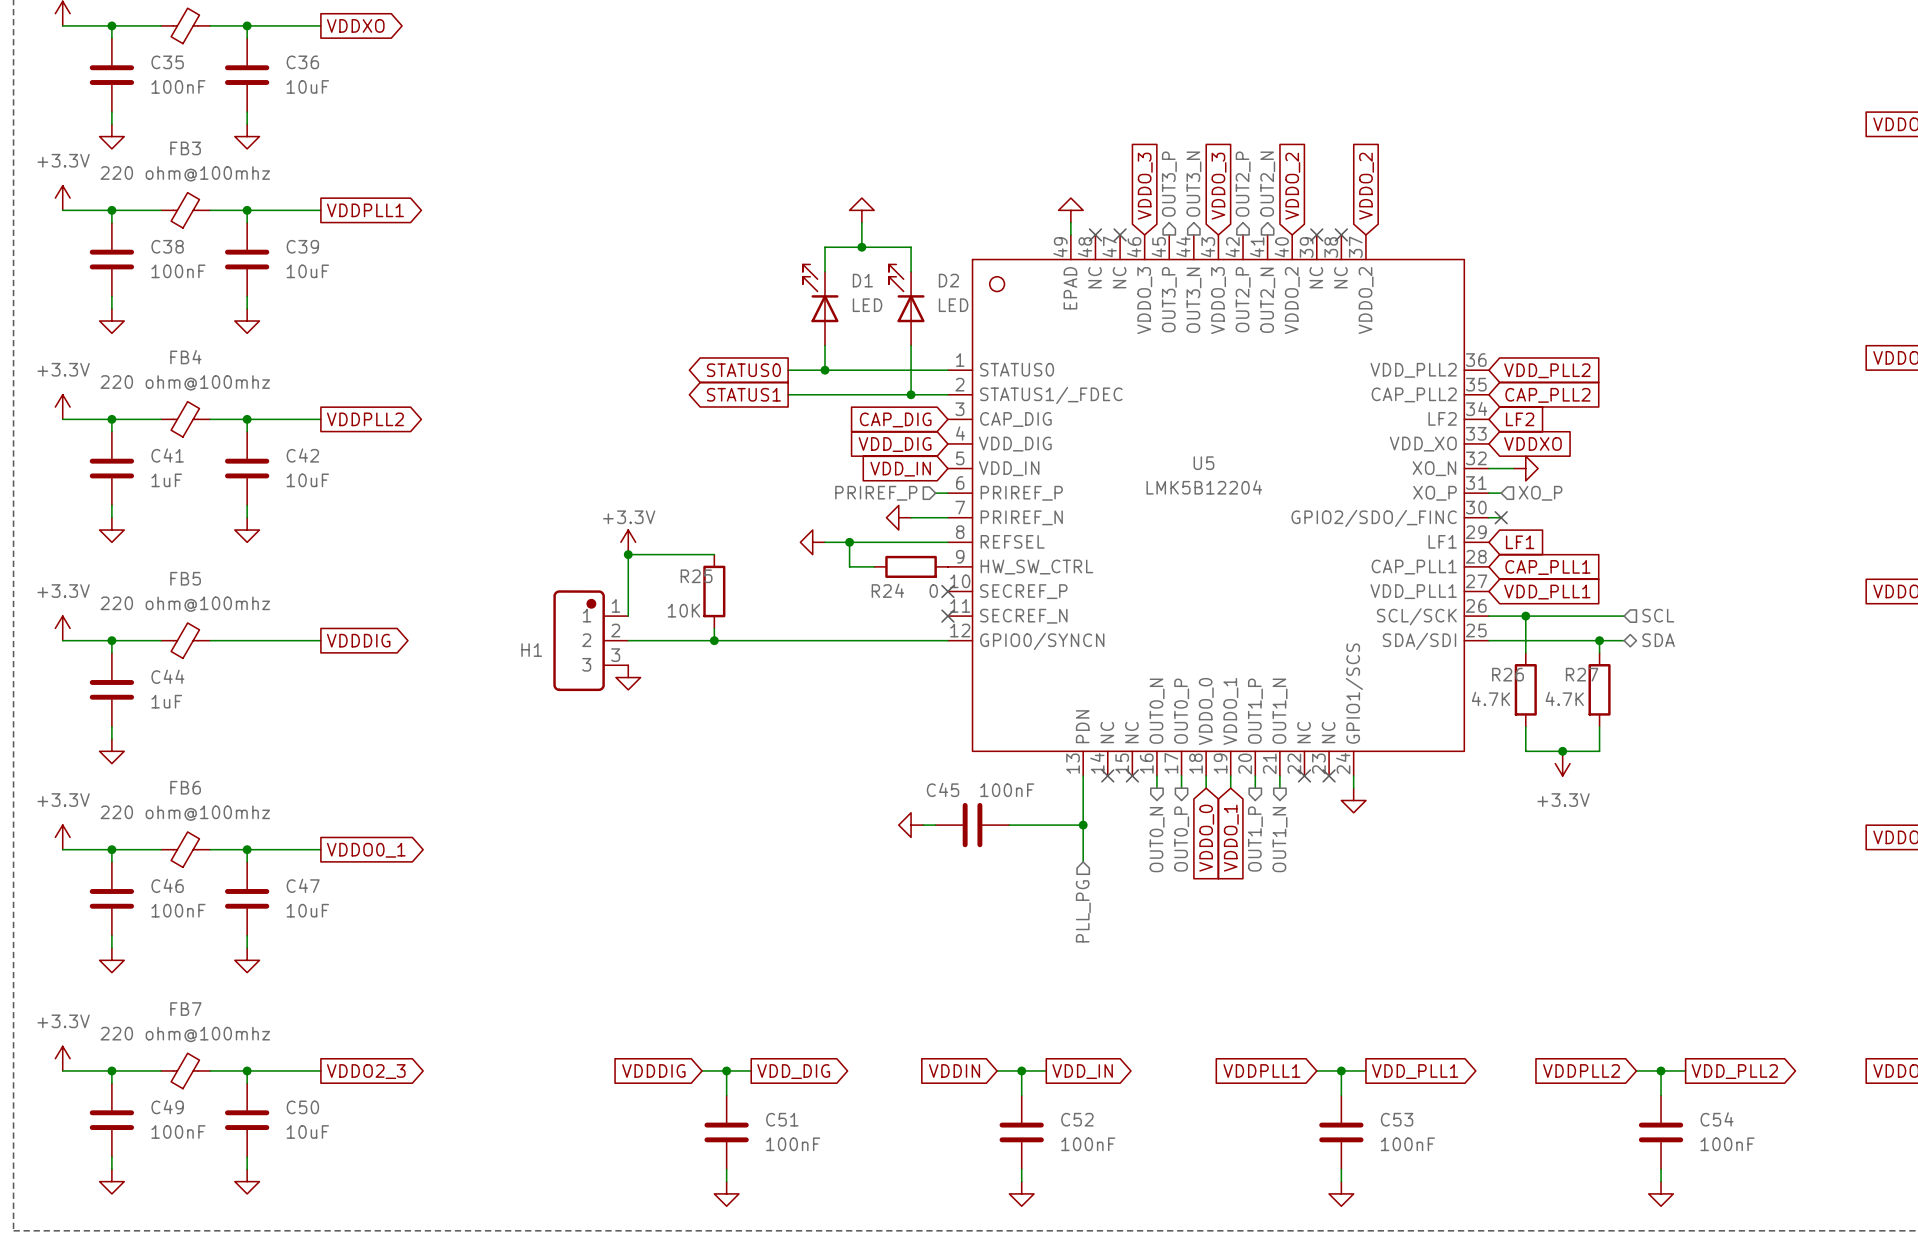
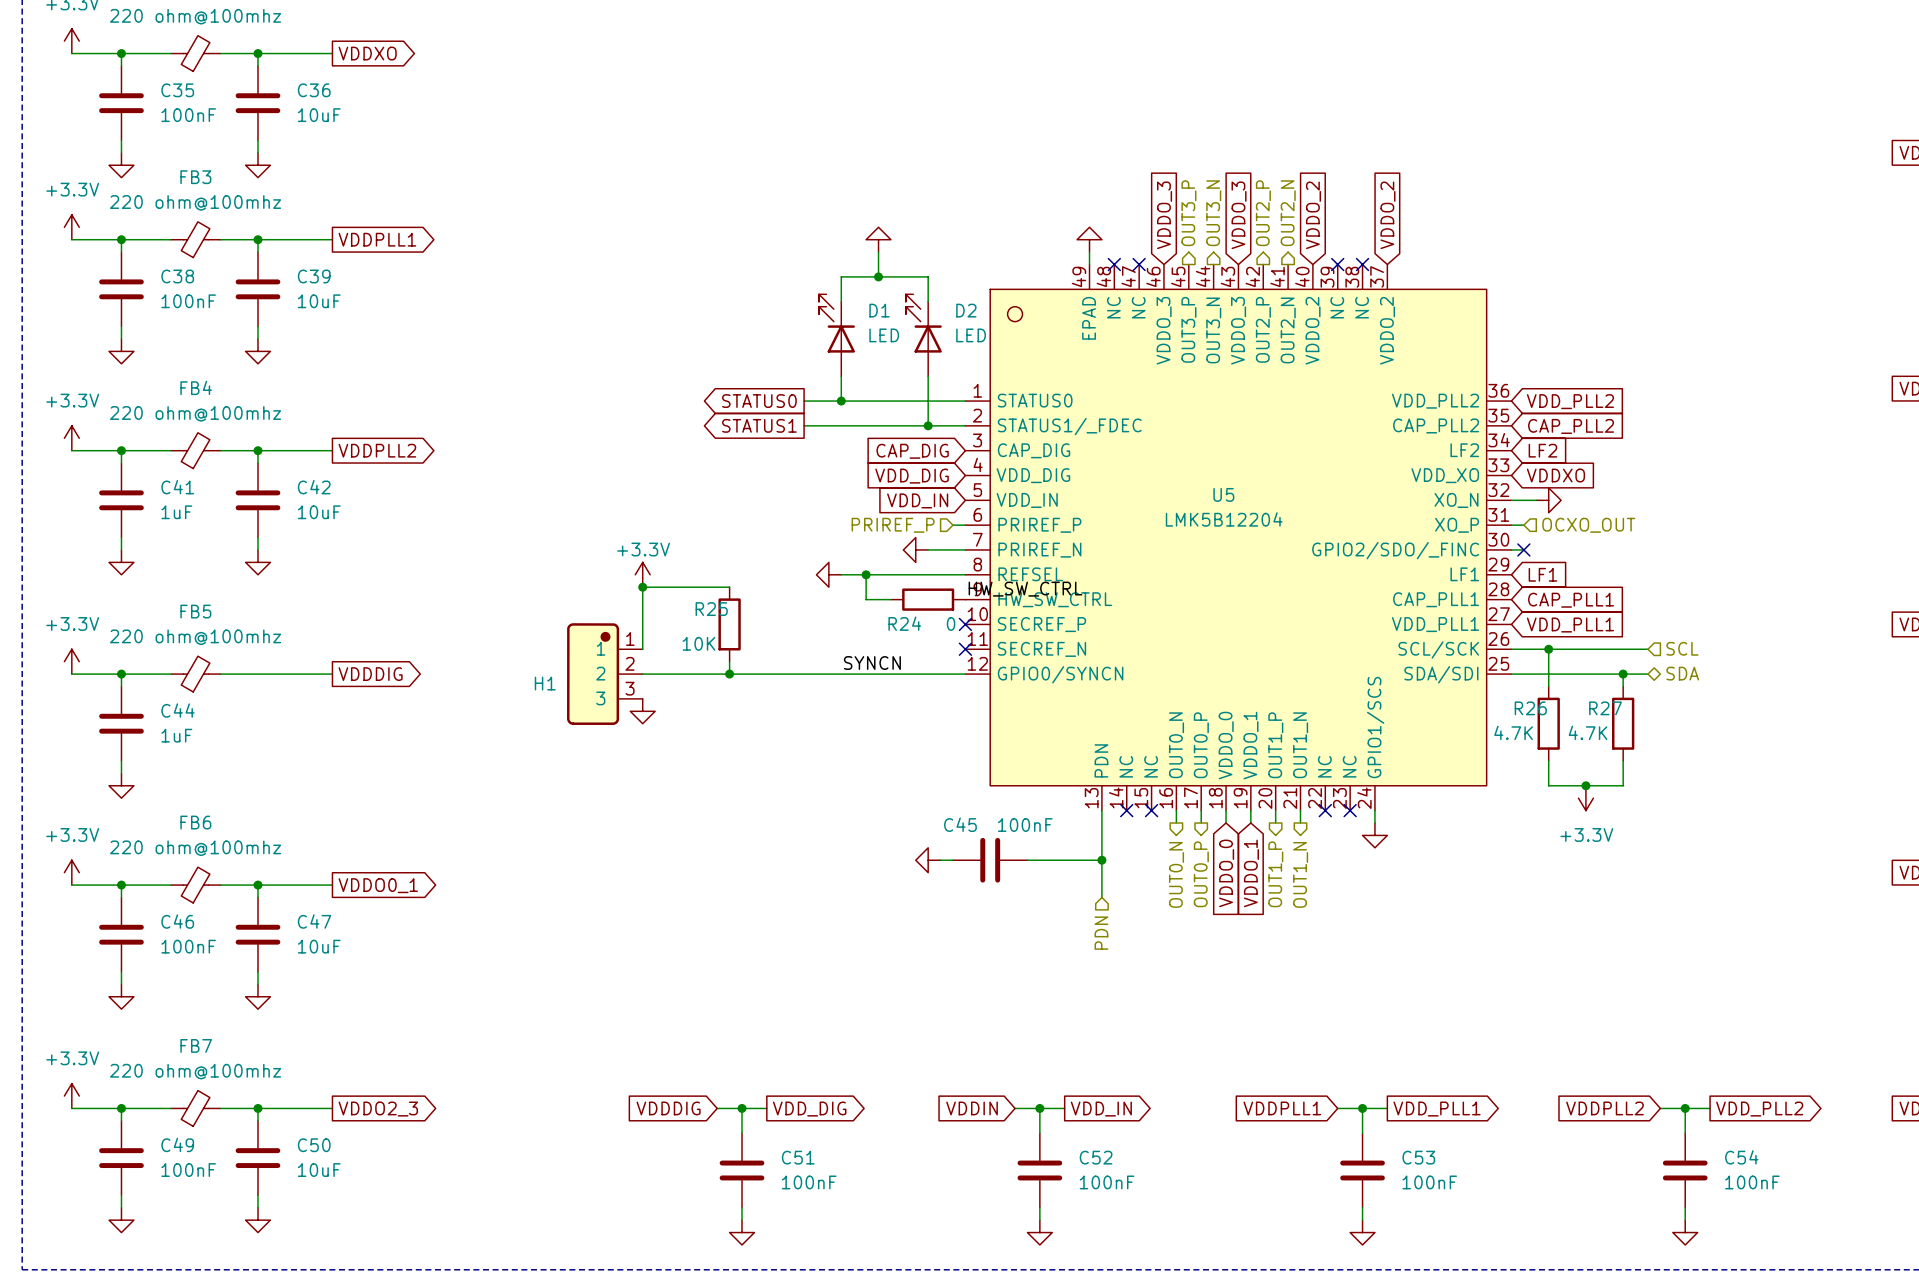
hierarchical label: XO_P (1540, 493) -> OCXO_OUT (1588, 525)
label: none -> HW_SW_CTRL (1025, 589)
label: none -> SYNCN (872, 663)
hierarchical label: PLL_PG (1083, 911) -> PDN (1101, 933)

